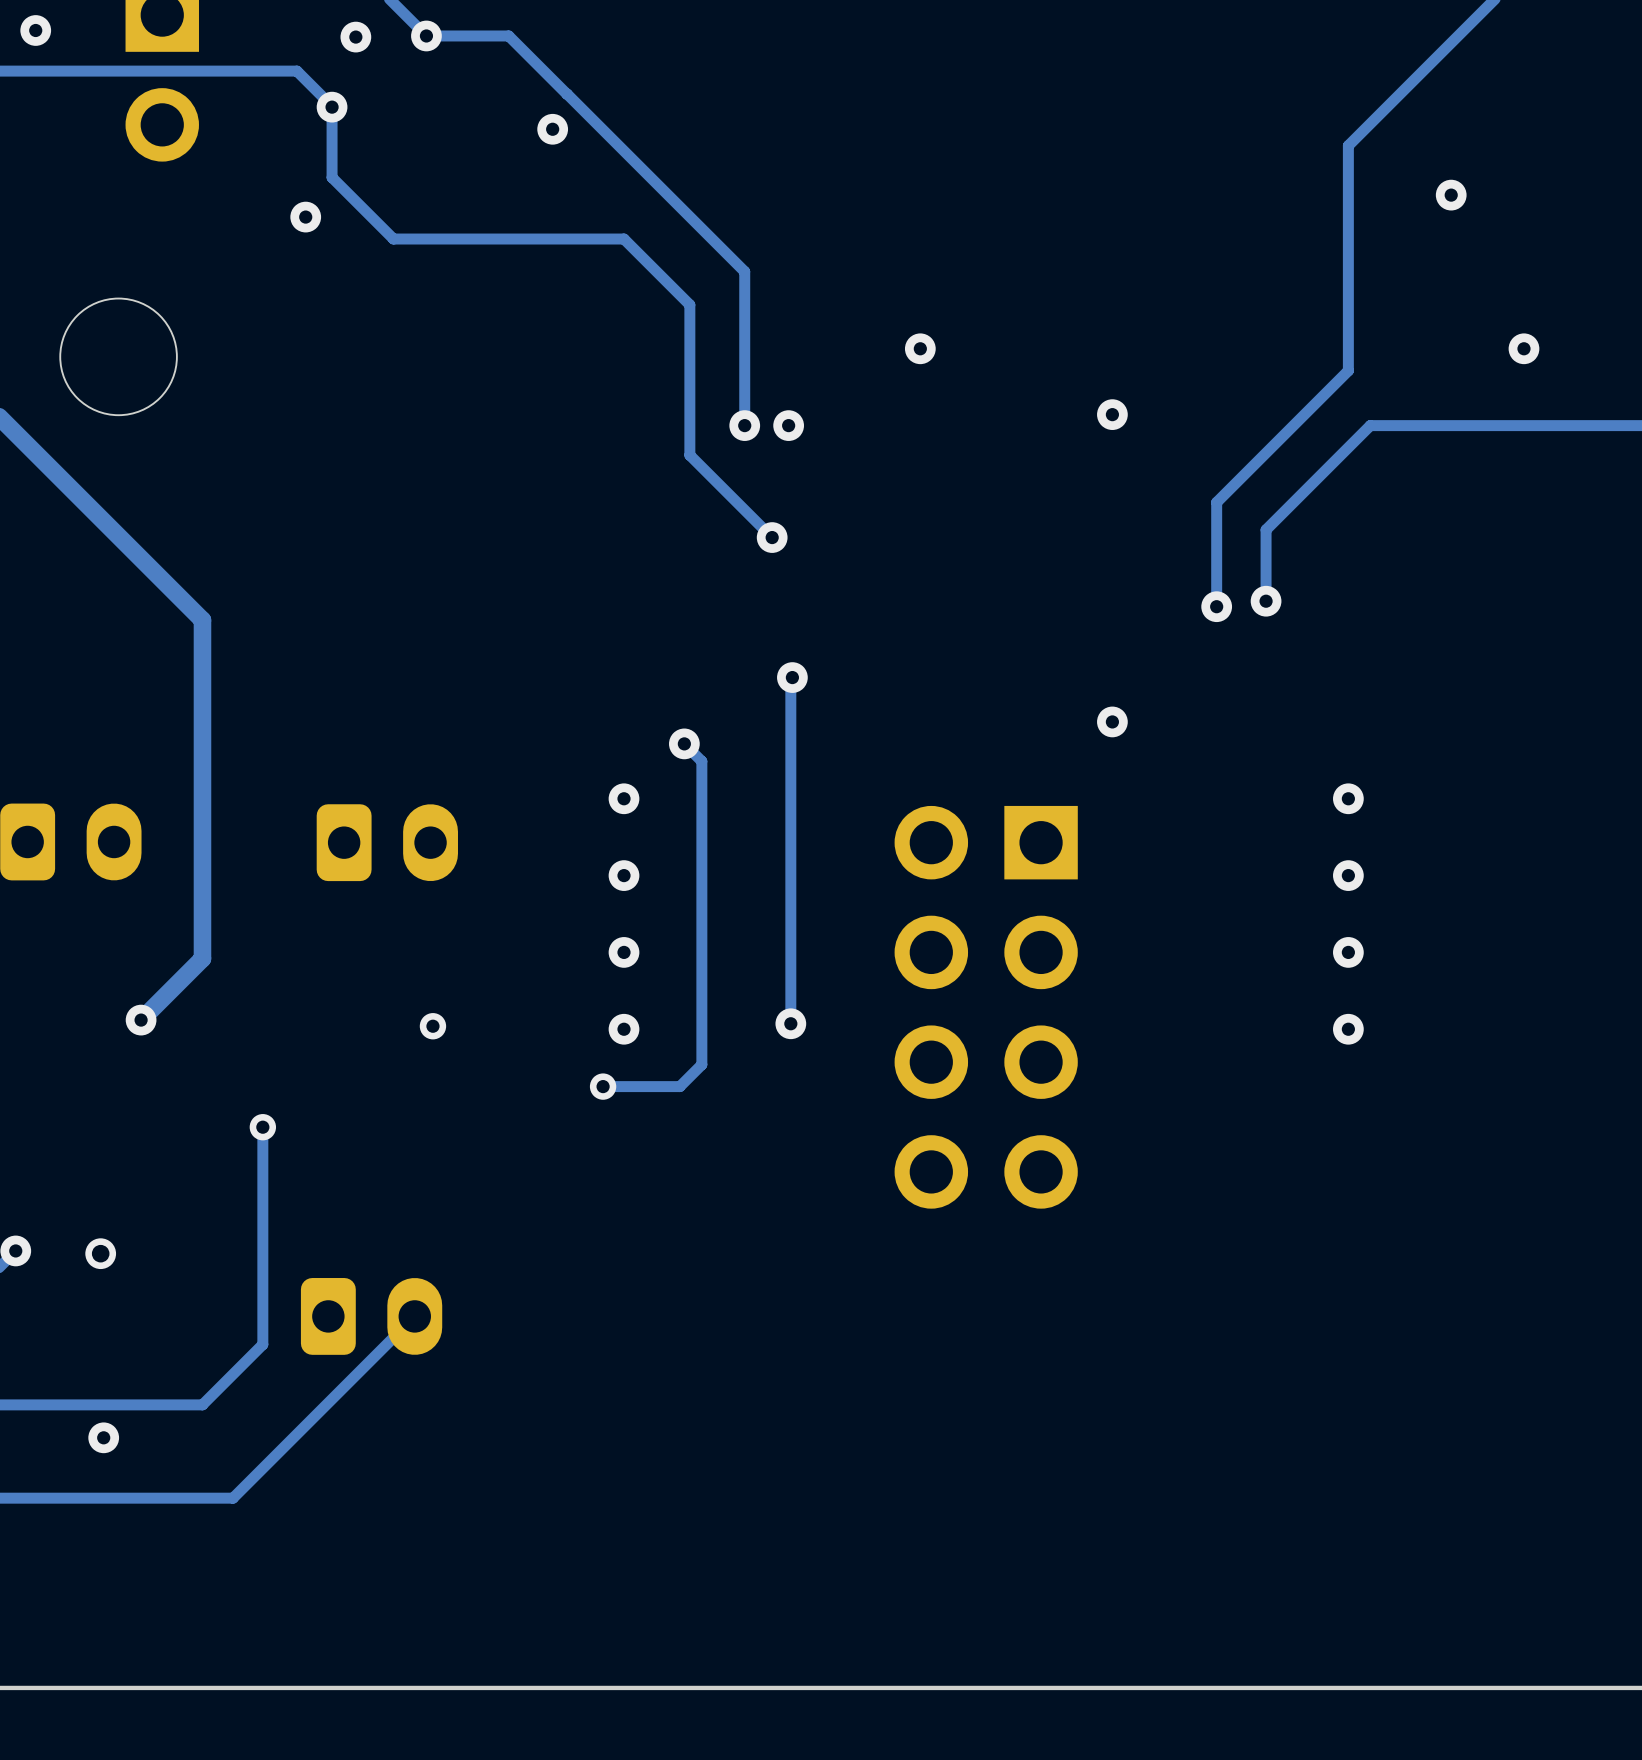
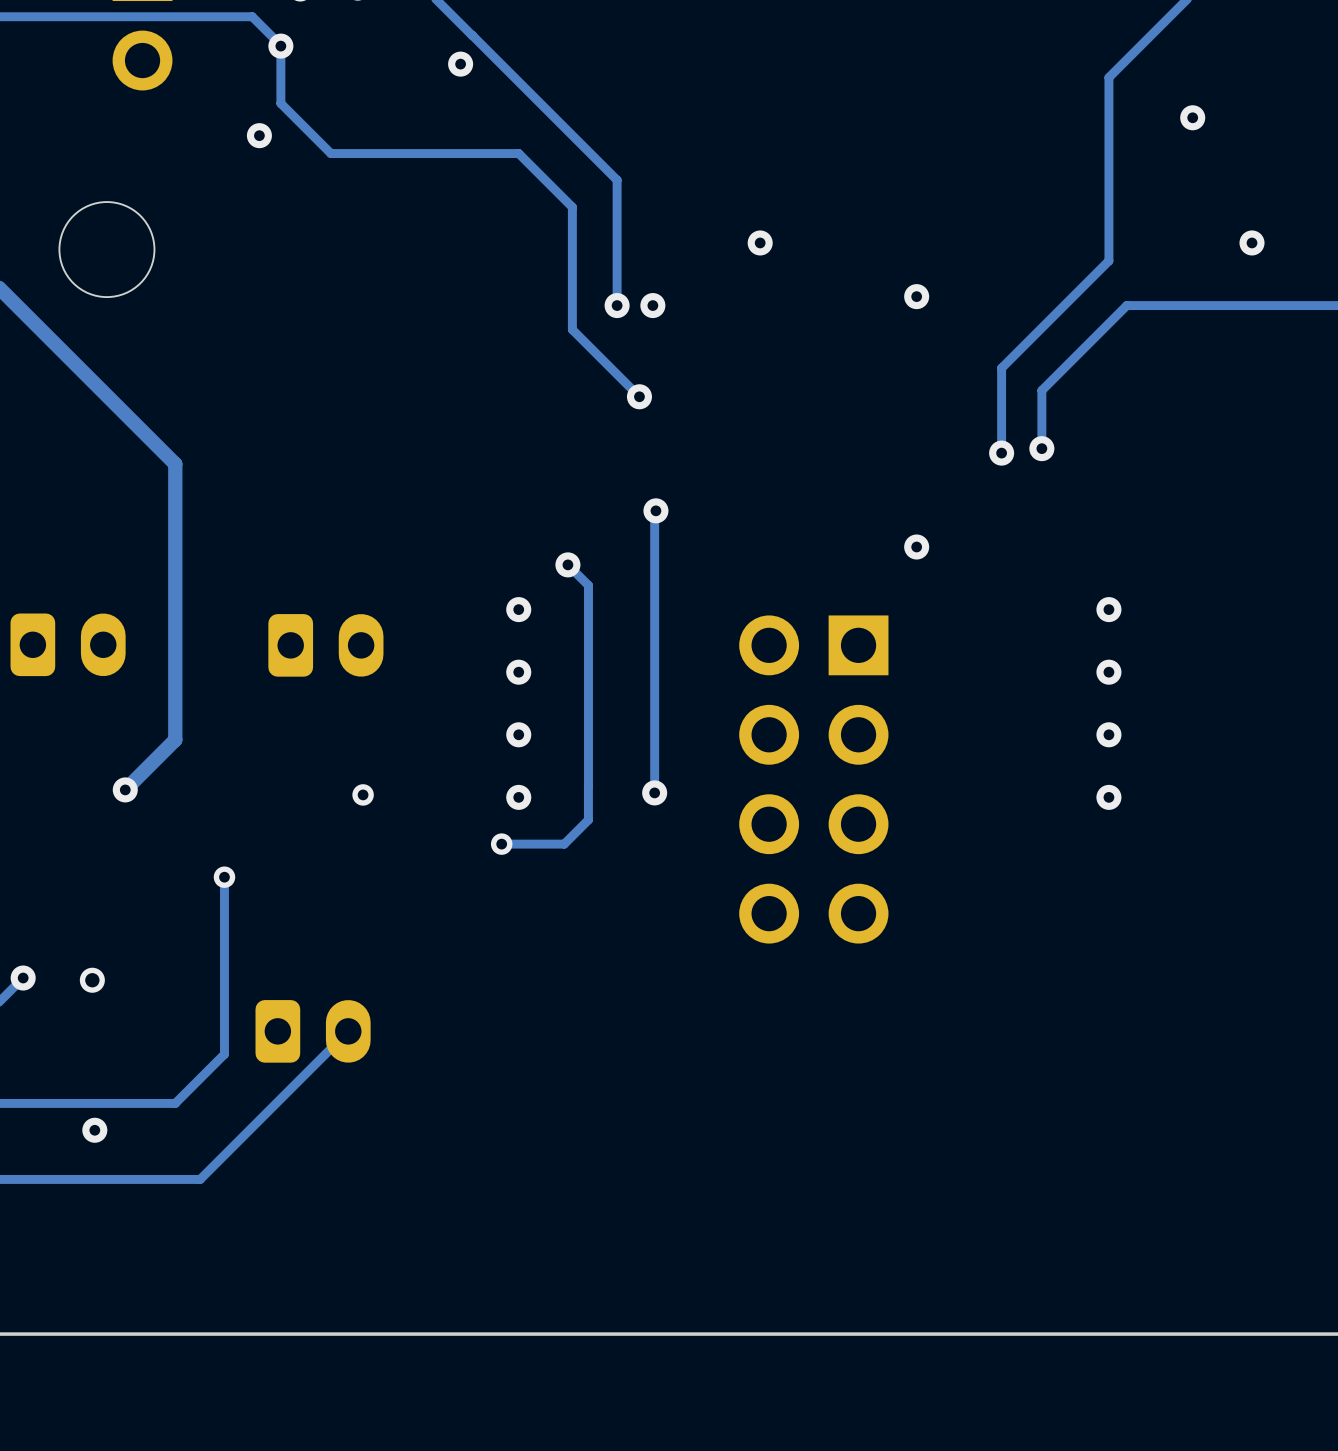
track: (701, 761) (701, 1064) -> (582, 579) (588, 585) (588, 786)
track: none -> (588, 786) (588, 819) (582, 826)

